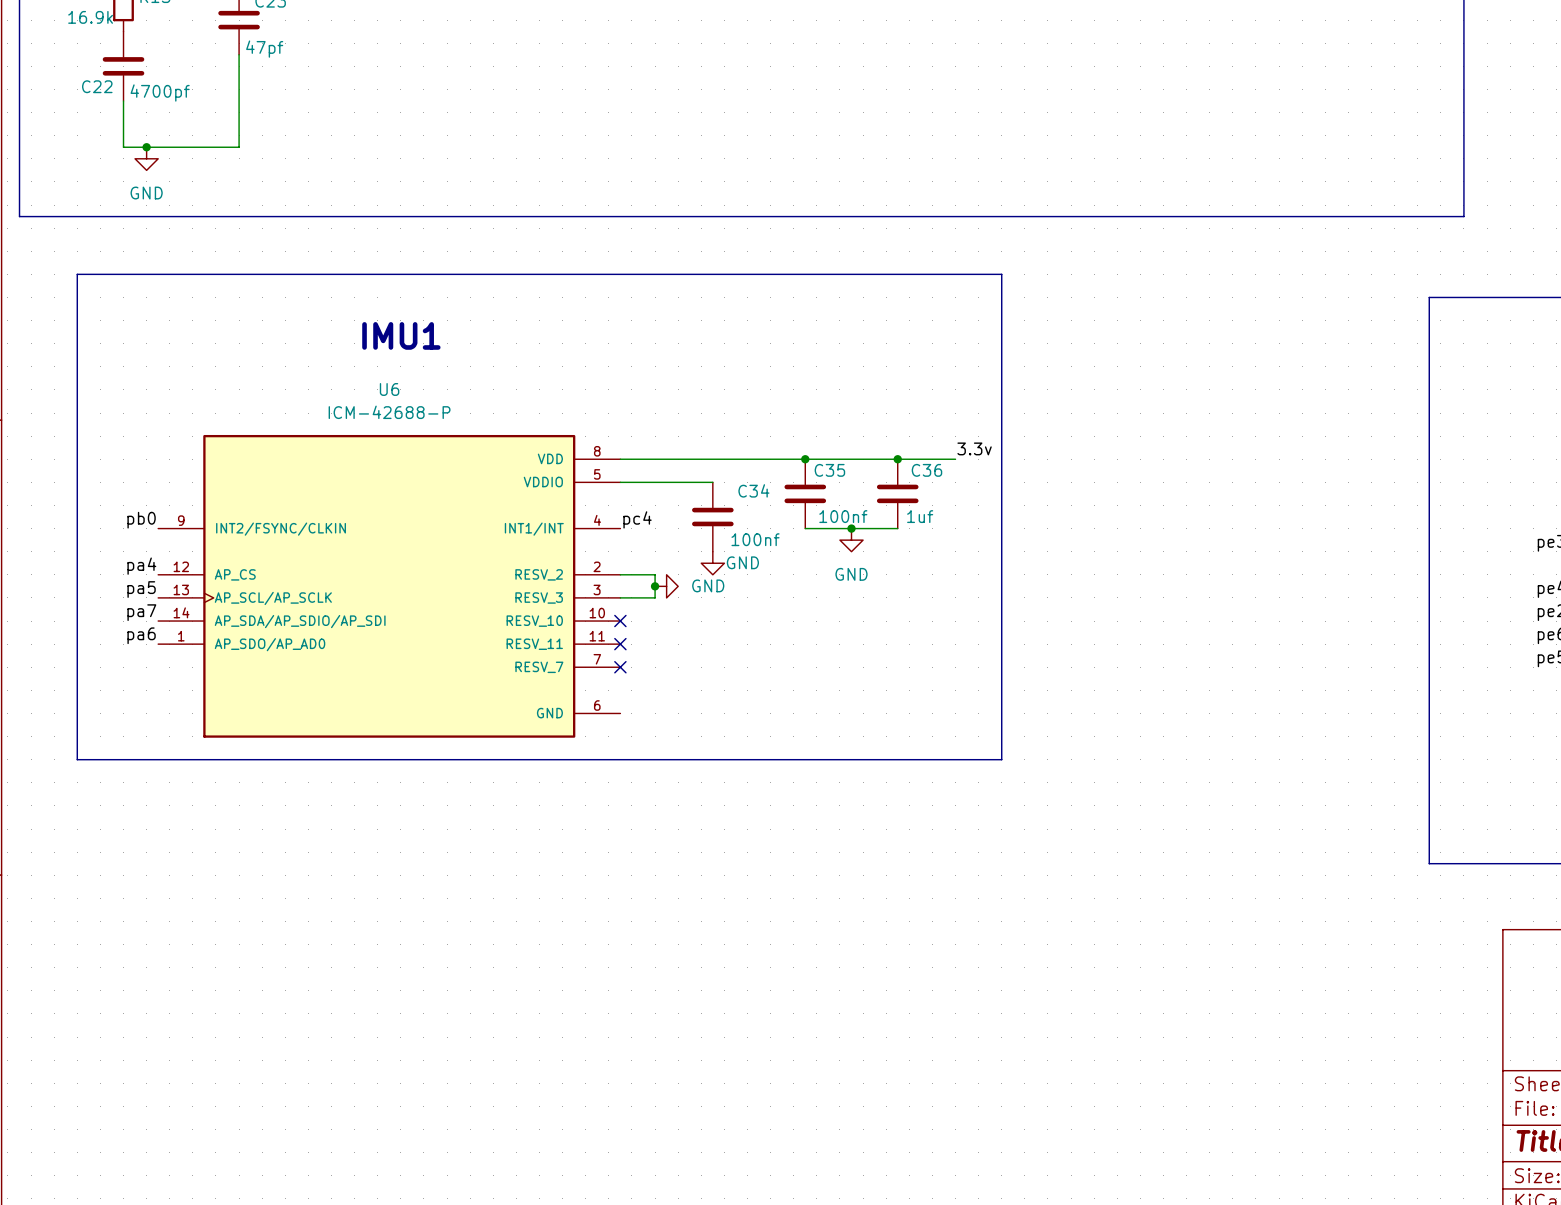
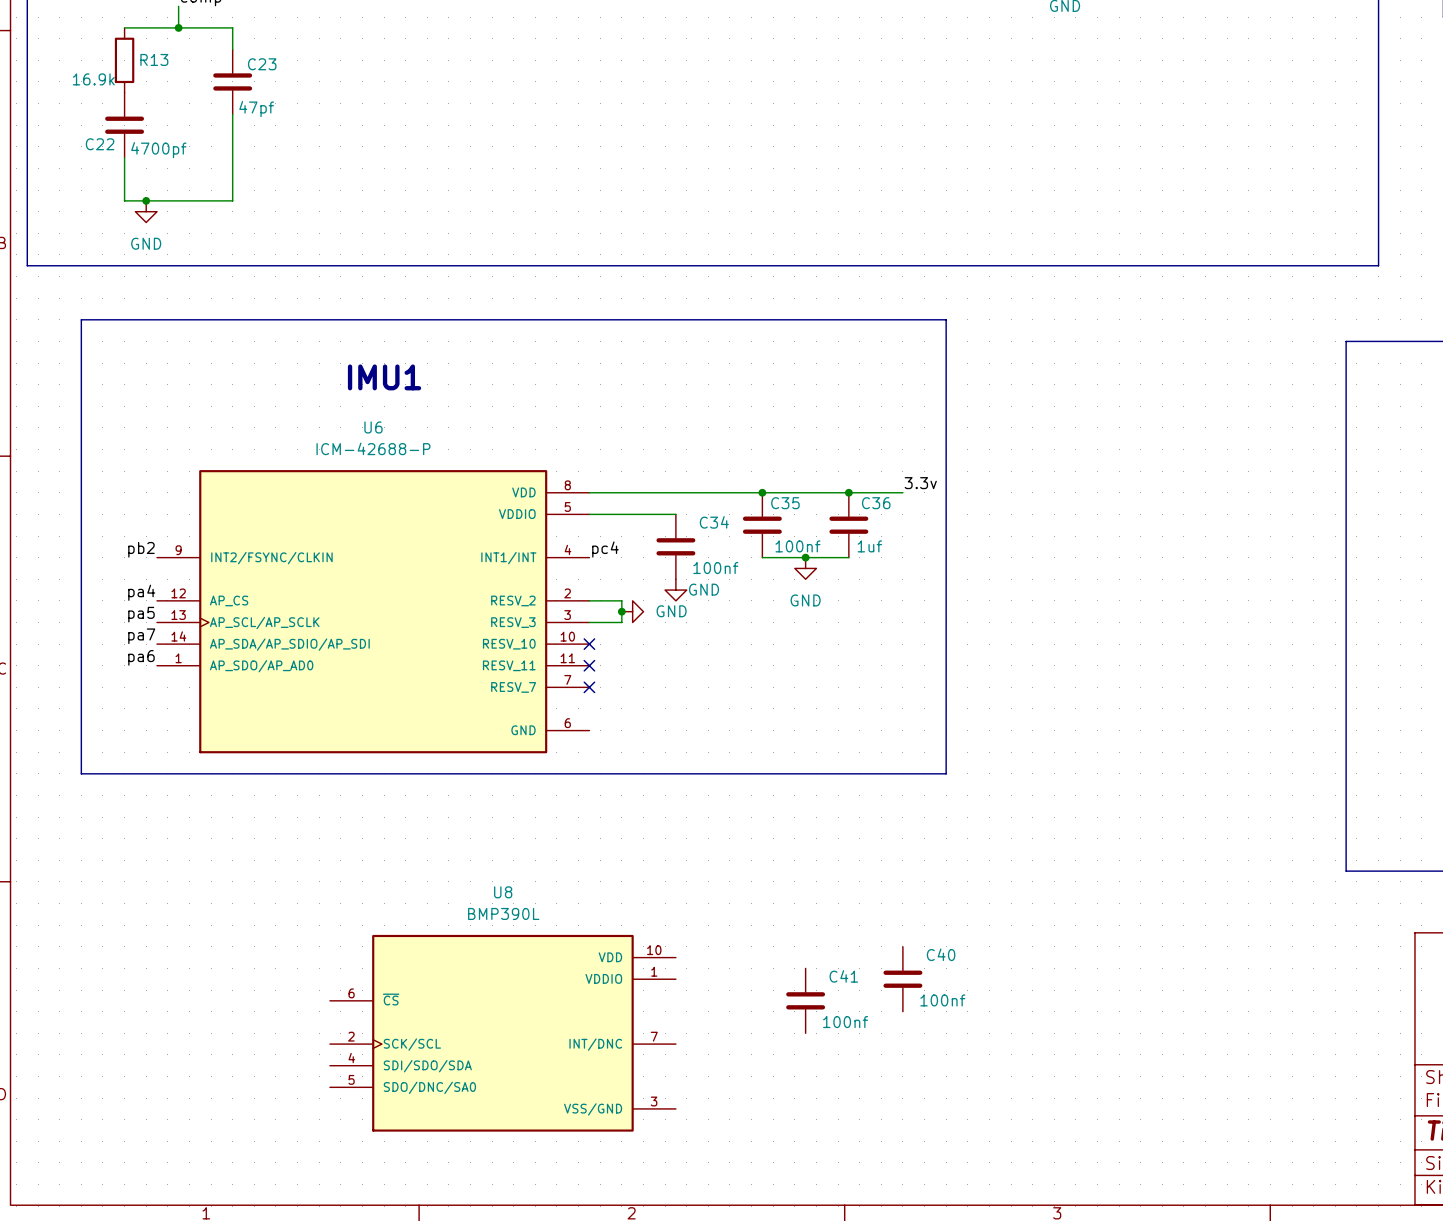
label: pb0 (141, 520) -> pb2 (141, 549)
C40: none -> 100nf (902, 979)
C41: none -> 100nf (805, 1000)
U8: none -> BMP390L (502, 1033)

